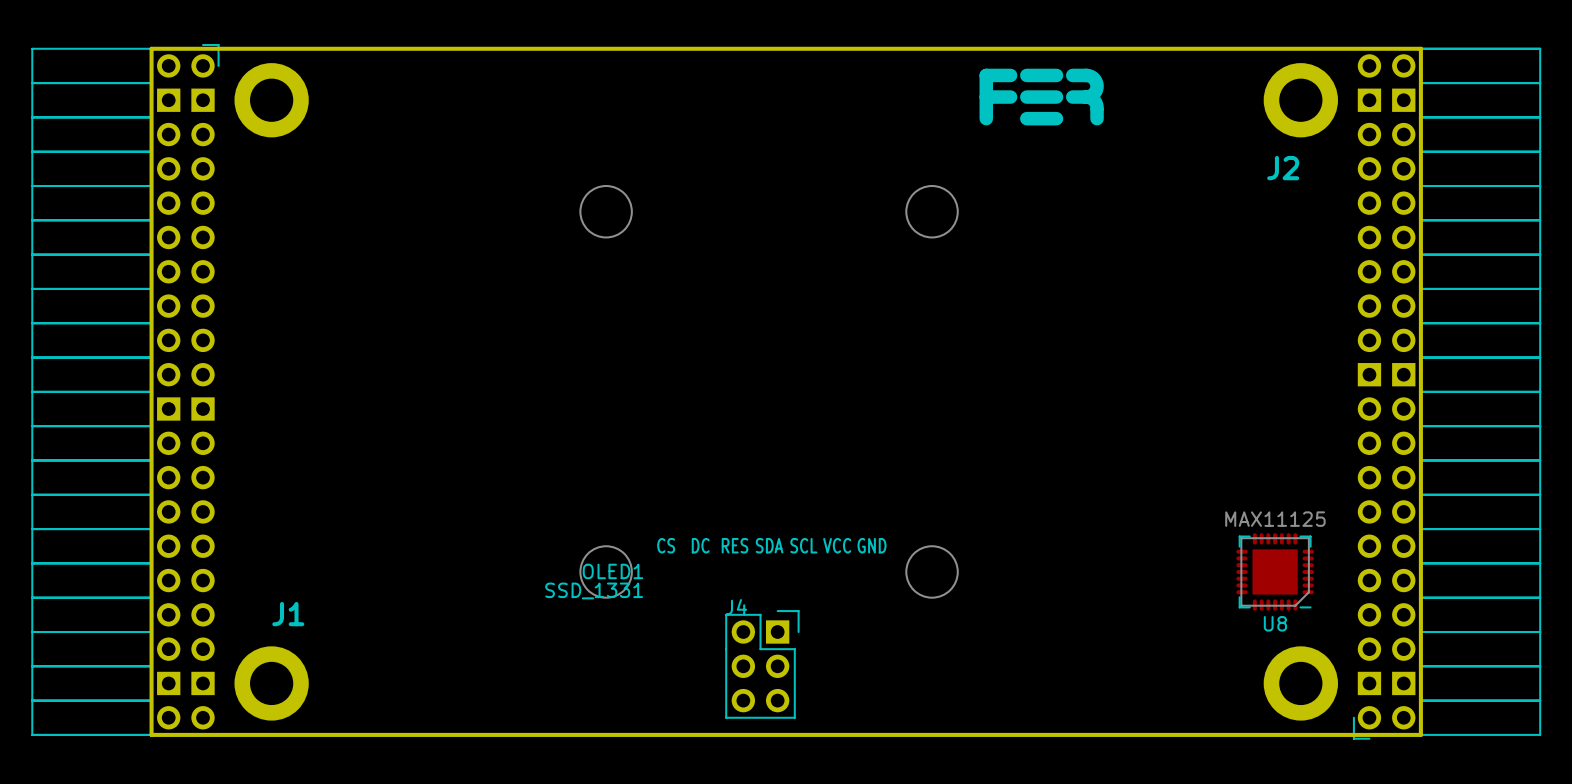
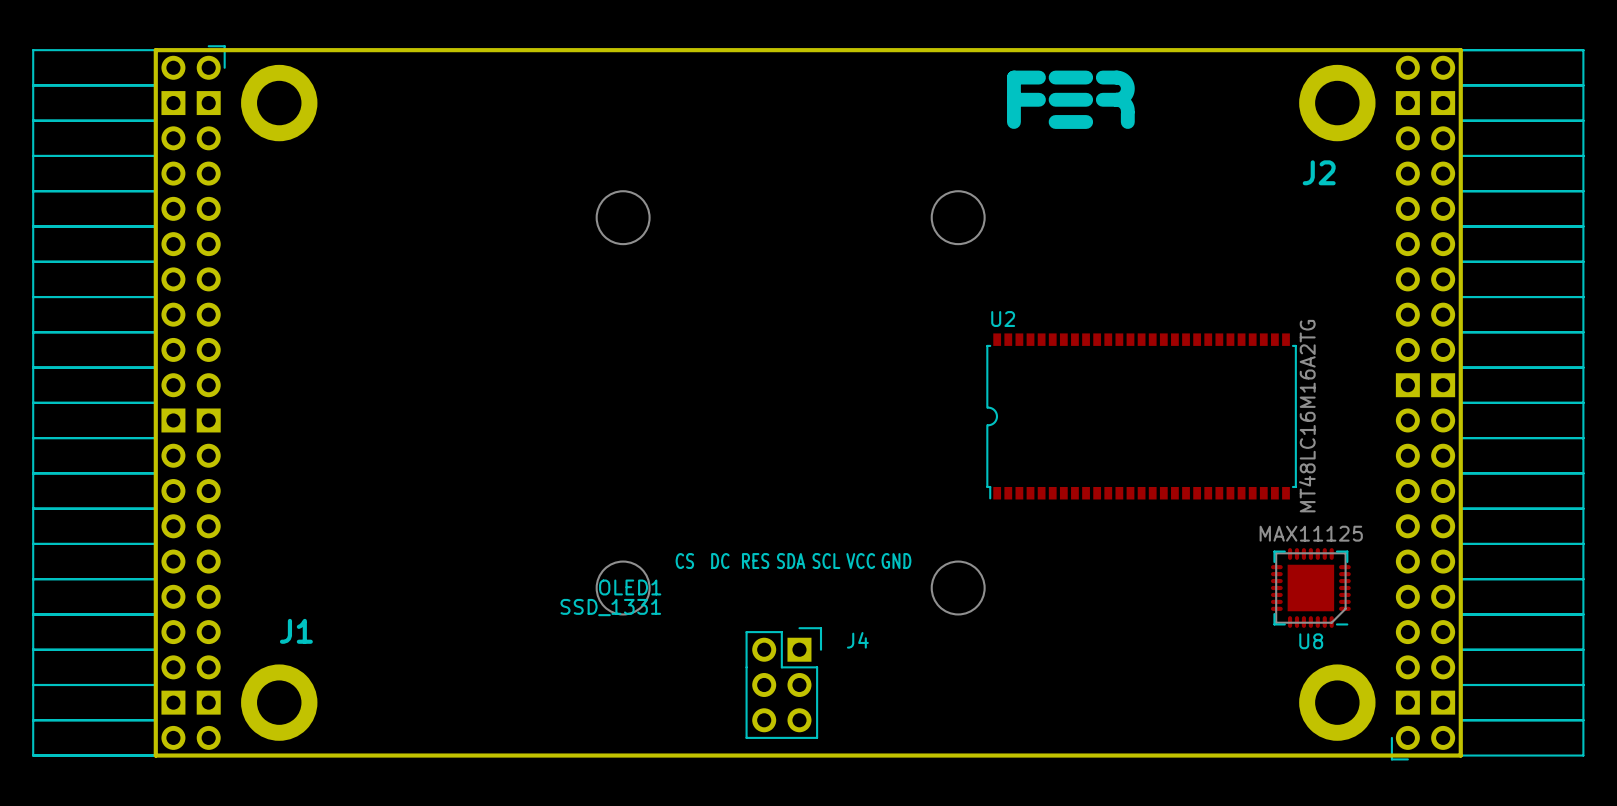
U2: none -> MT48LC16M16A2TG (1141, 416)
J4 name position: J4 (736, 607) -> J4 (857, 640)

